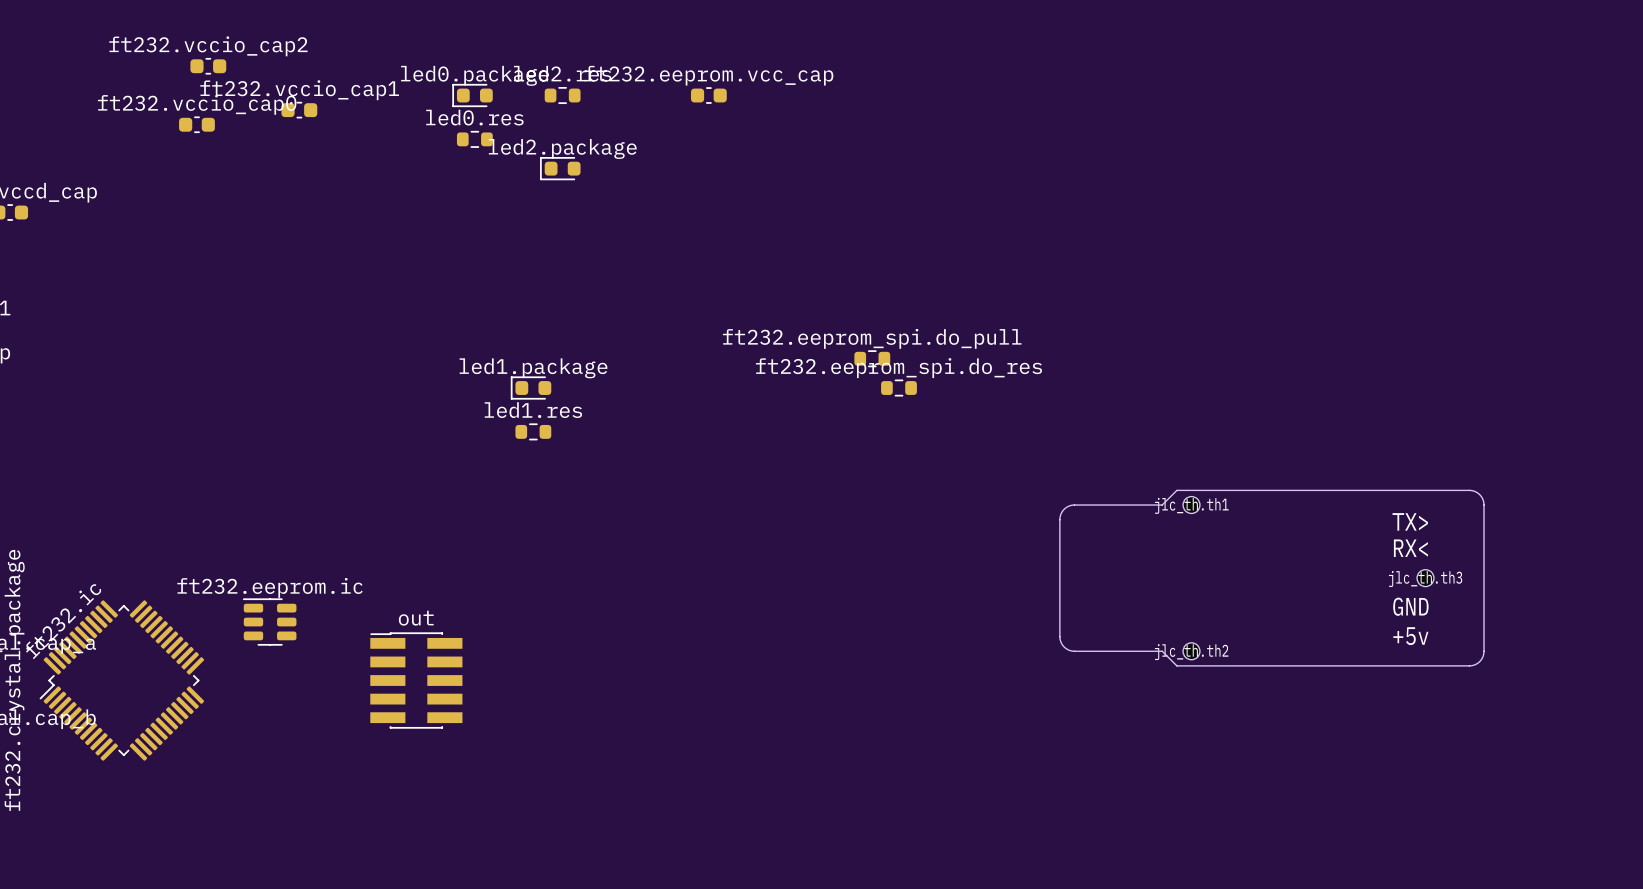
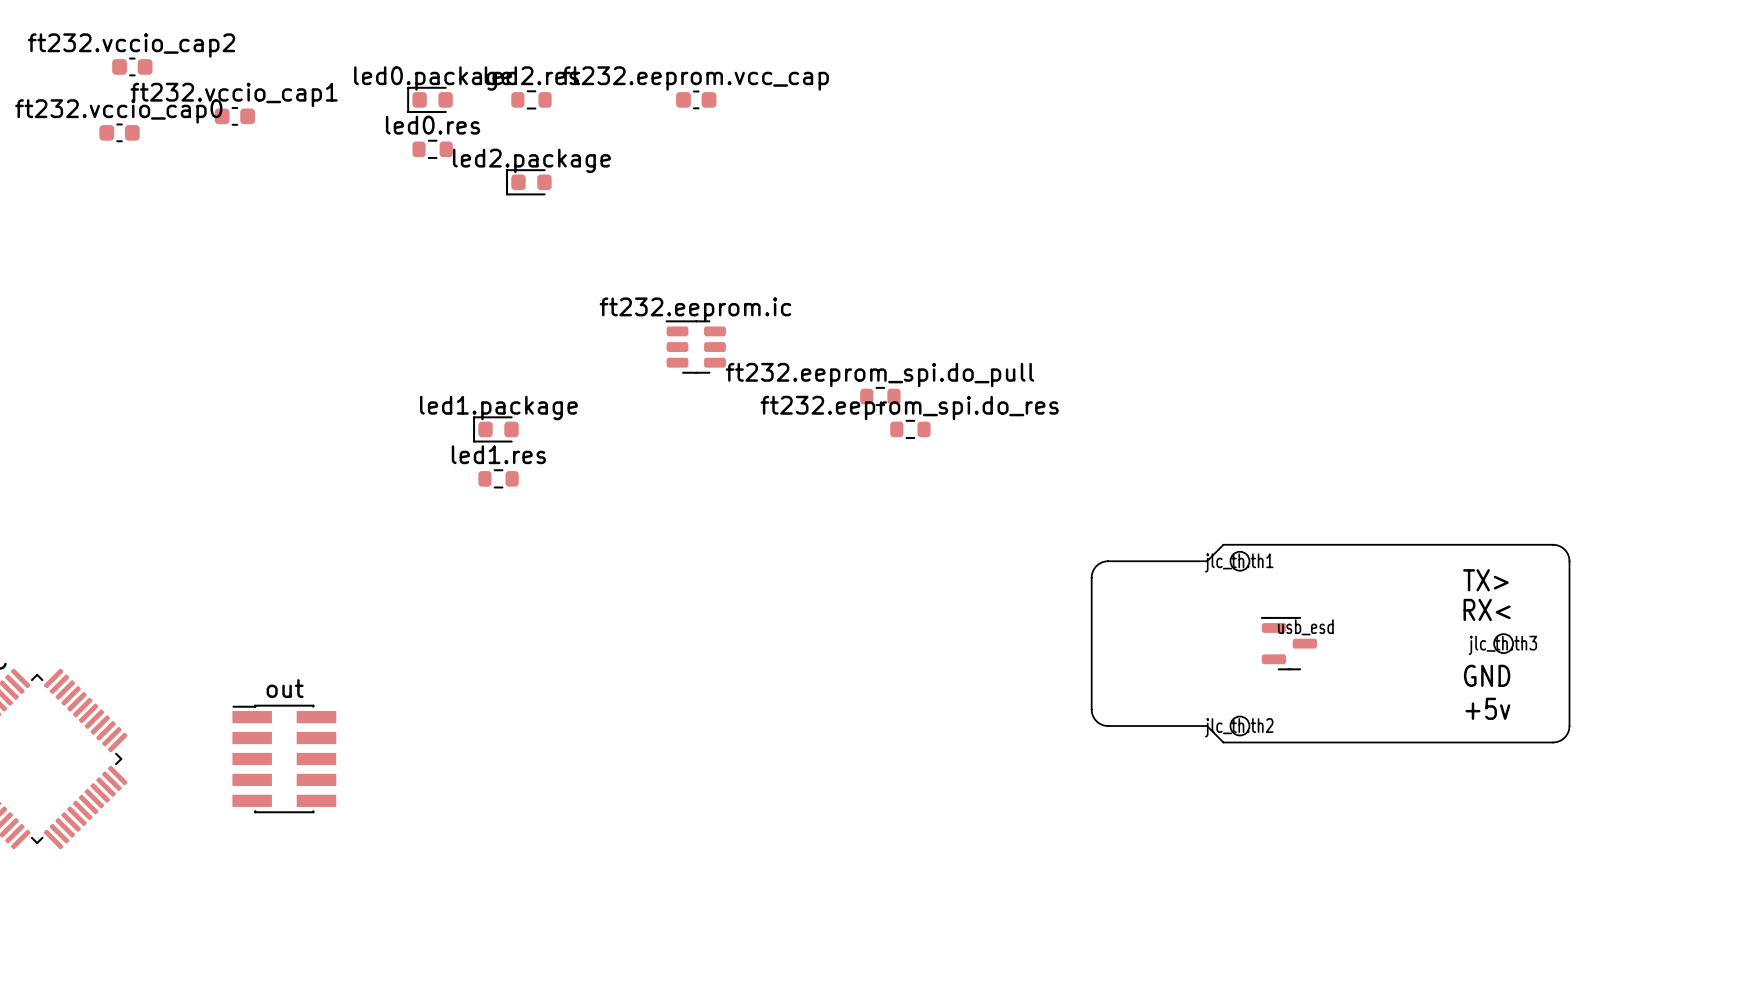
usb_esd: none -> (1288, 643)
ft232.eeprom.ic position: (269, 622) -> (695, 347)
out position: (416, 680) -> (284, 758)

